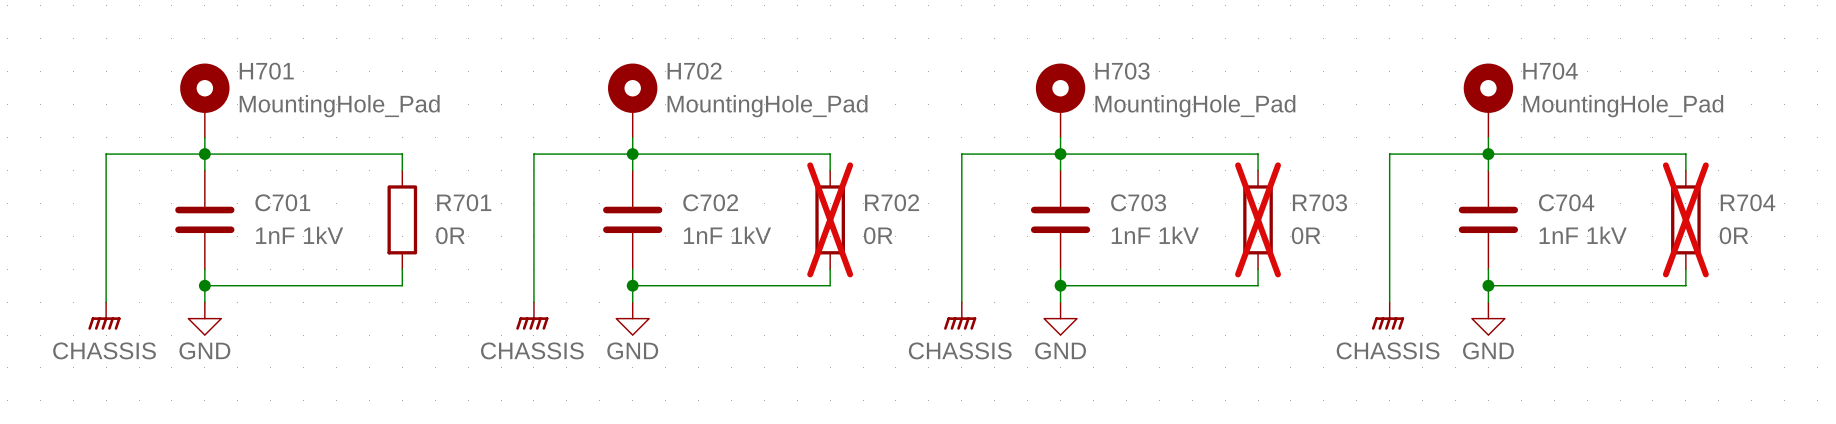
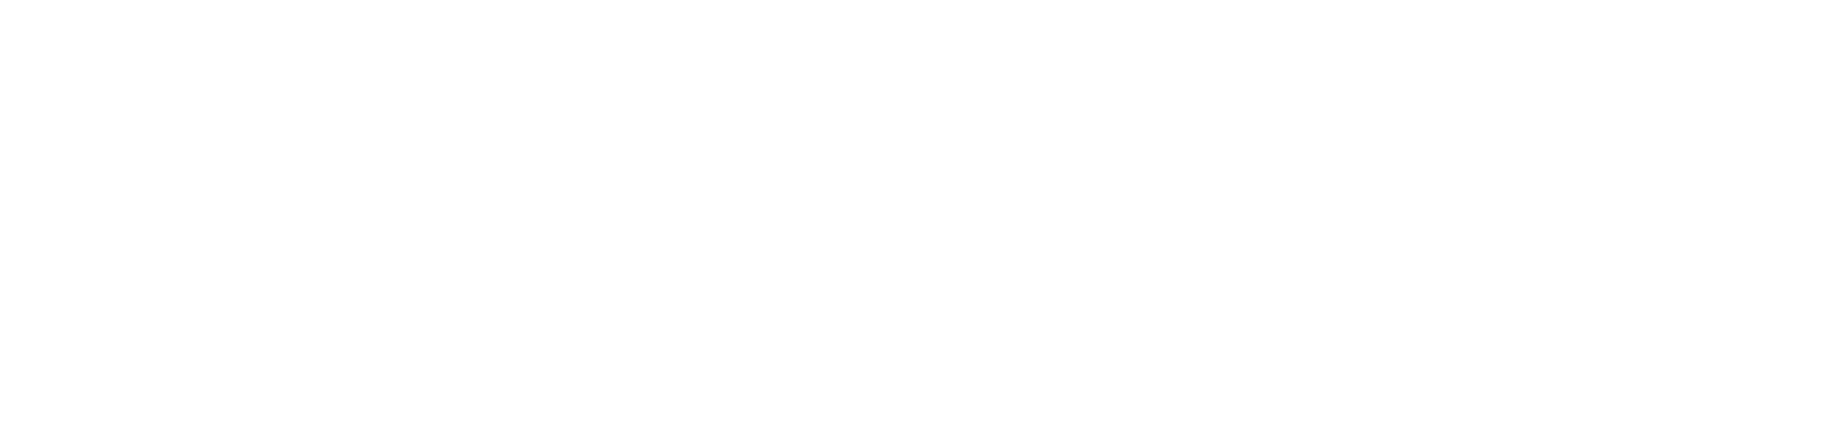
H701: MountingHole_Pad (204, 100) -> none
H702: MountingHole_Pad (632, 100) -> none
H703: MountingHole_Pad (1060, 100) -> none
H704: MountingHole_Pad (1488, 100) -> none
wire: (204, 137) (204, 170) -> none
wire: (632, 137) (632, 170) -> none
wire: (1060, 137) (1060, 170) -> none
wire: (1488, 137) (1488, 170) -> none
junction: (204, 154) -> none
junction: (632, 154) -> none
junction: (1060, 154) -> none
junction: (1488, 154) -> none
wire: (402, 170) (402, 154) (106, 154) (106, 302) -> none
wire: (830, 170) (830, 154) (533, 154) (533, 302) -> none
wire: (1258, 170) (1258, 154) (961, 154) (961, 302) -> none
wire: (1685, 170) (1685, 154) (1389, 154) (1389, 302) -> none
C701: 1nF 1kV (204, 219) -> none
R701: 0R (402, 219) -> none
C702: 1nF 1kV (632, 219) -> none
R702: 0R (830, 219) -> none
C703: 1nF 1kV (1060, 219) -> none
R703: 0R (1258, 219) -> none
C704: 1nF 1kV (1488, 219) -> none
R704: 0R (1685, 219) -> none
wire: (204, 269) (204, 302) -> none
wire: (402, 269) (402, 285) (204, 285) -> none
wire: (632, 269) (632, 302) -> none
wire: (830, 269) (830, 285) (632, 285) -> none
wire: (1060, 269) (1060, 302) -> none
wire: (1258, 269) (1258, 285) (1060, 285) -> none
wire: (1488, 269) (1488, 302) -> none
wire: (1685, 269) (1685, 285) (1488, 285) -> none
junction: (204, 285) -> none
junction: (632, 285) -> none
junction: (1060, 285) -> none
junction: (1488, 285) -> none
power symbol: CHASSIS (104, 315) -> none
power symbol: CHASSIS (532, 315) -> none
power symbol: CHASSIS (960, 315) -> none
power symbol: CHASSIS (1388, 315) -> none
power symbol: GND (204, 318) -> none
power symbol: GND (632, 318) -> none
power symbol: GND (1060, 318) -> none
power symbol: GND (1488, 318) -> none

